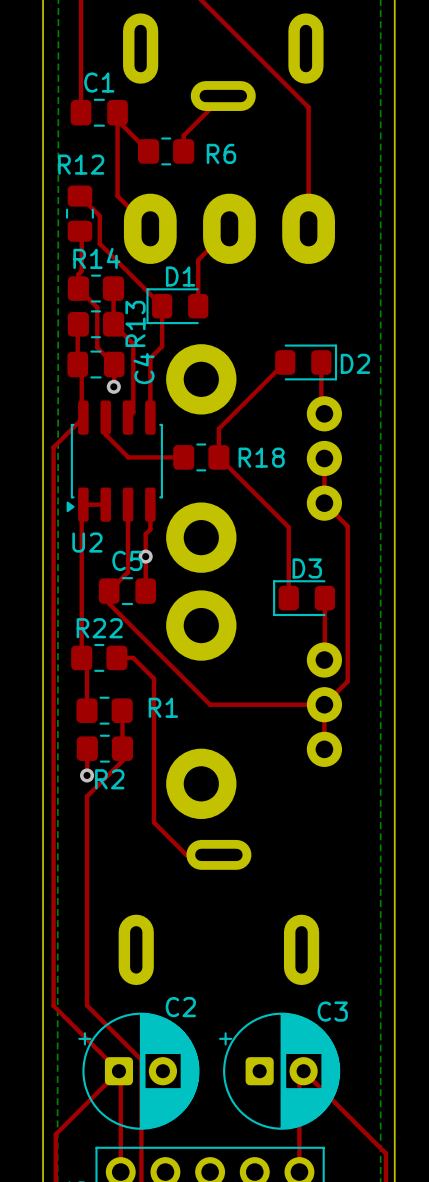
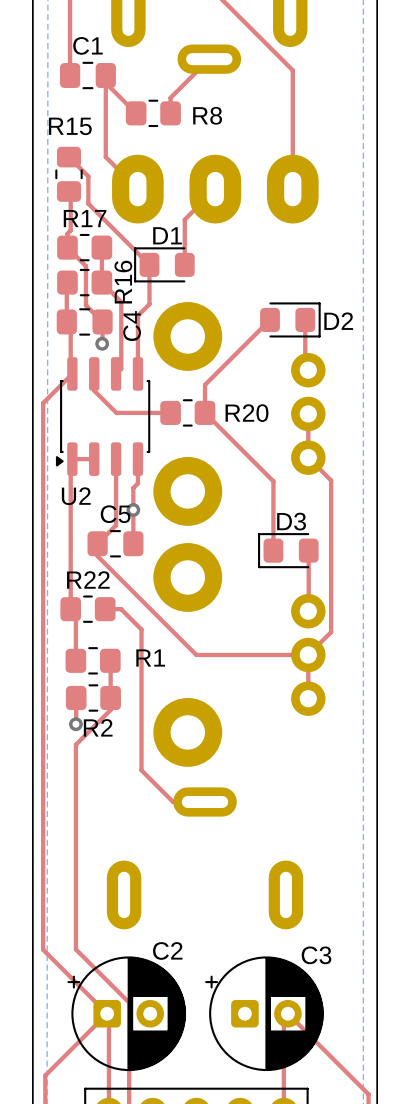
R6 name: R6 (221, 153) -> R8 (207, 115)
R12 name: R12 (81, 164) -> R15 (70, 126)
R14 name: R14 (96, 258) -> R17 (85, 218)
R13 name: R13 (135, 323) -> R16 (123, 282)
R18 name: R18 (261, 457) -> R20 (247, 413)

